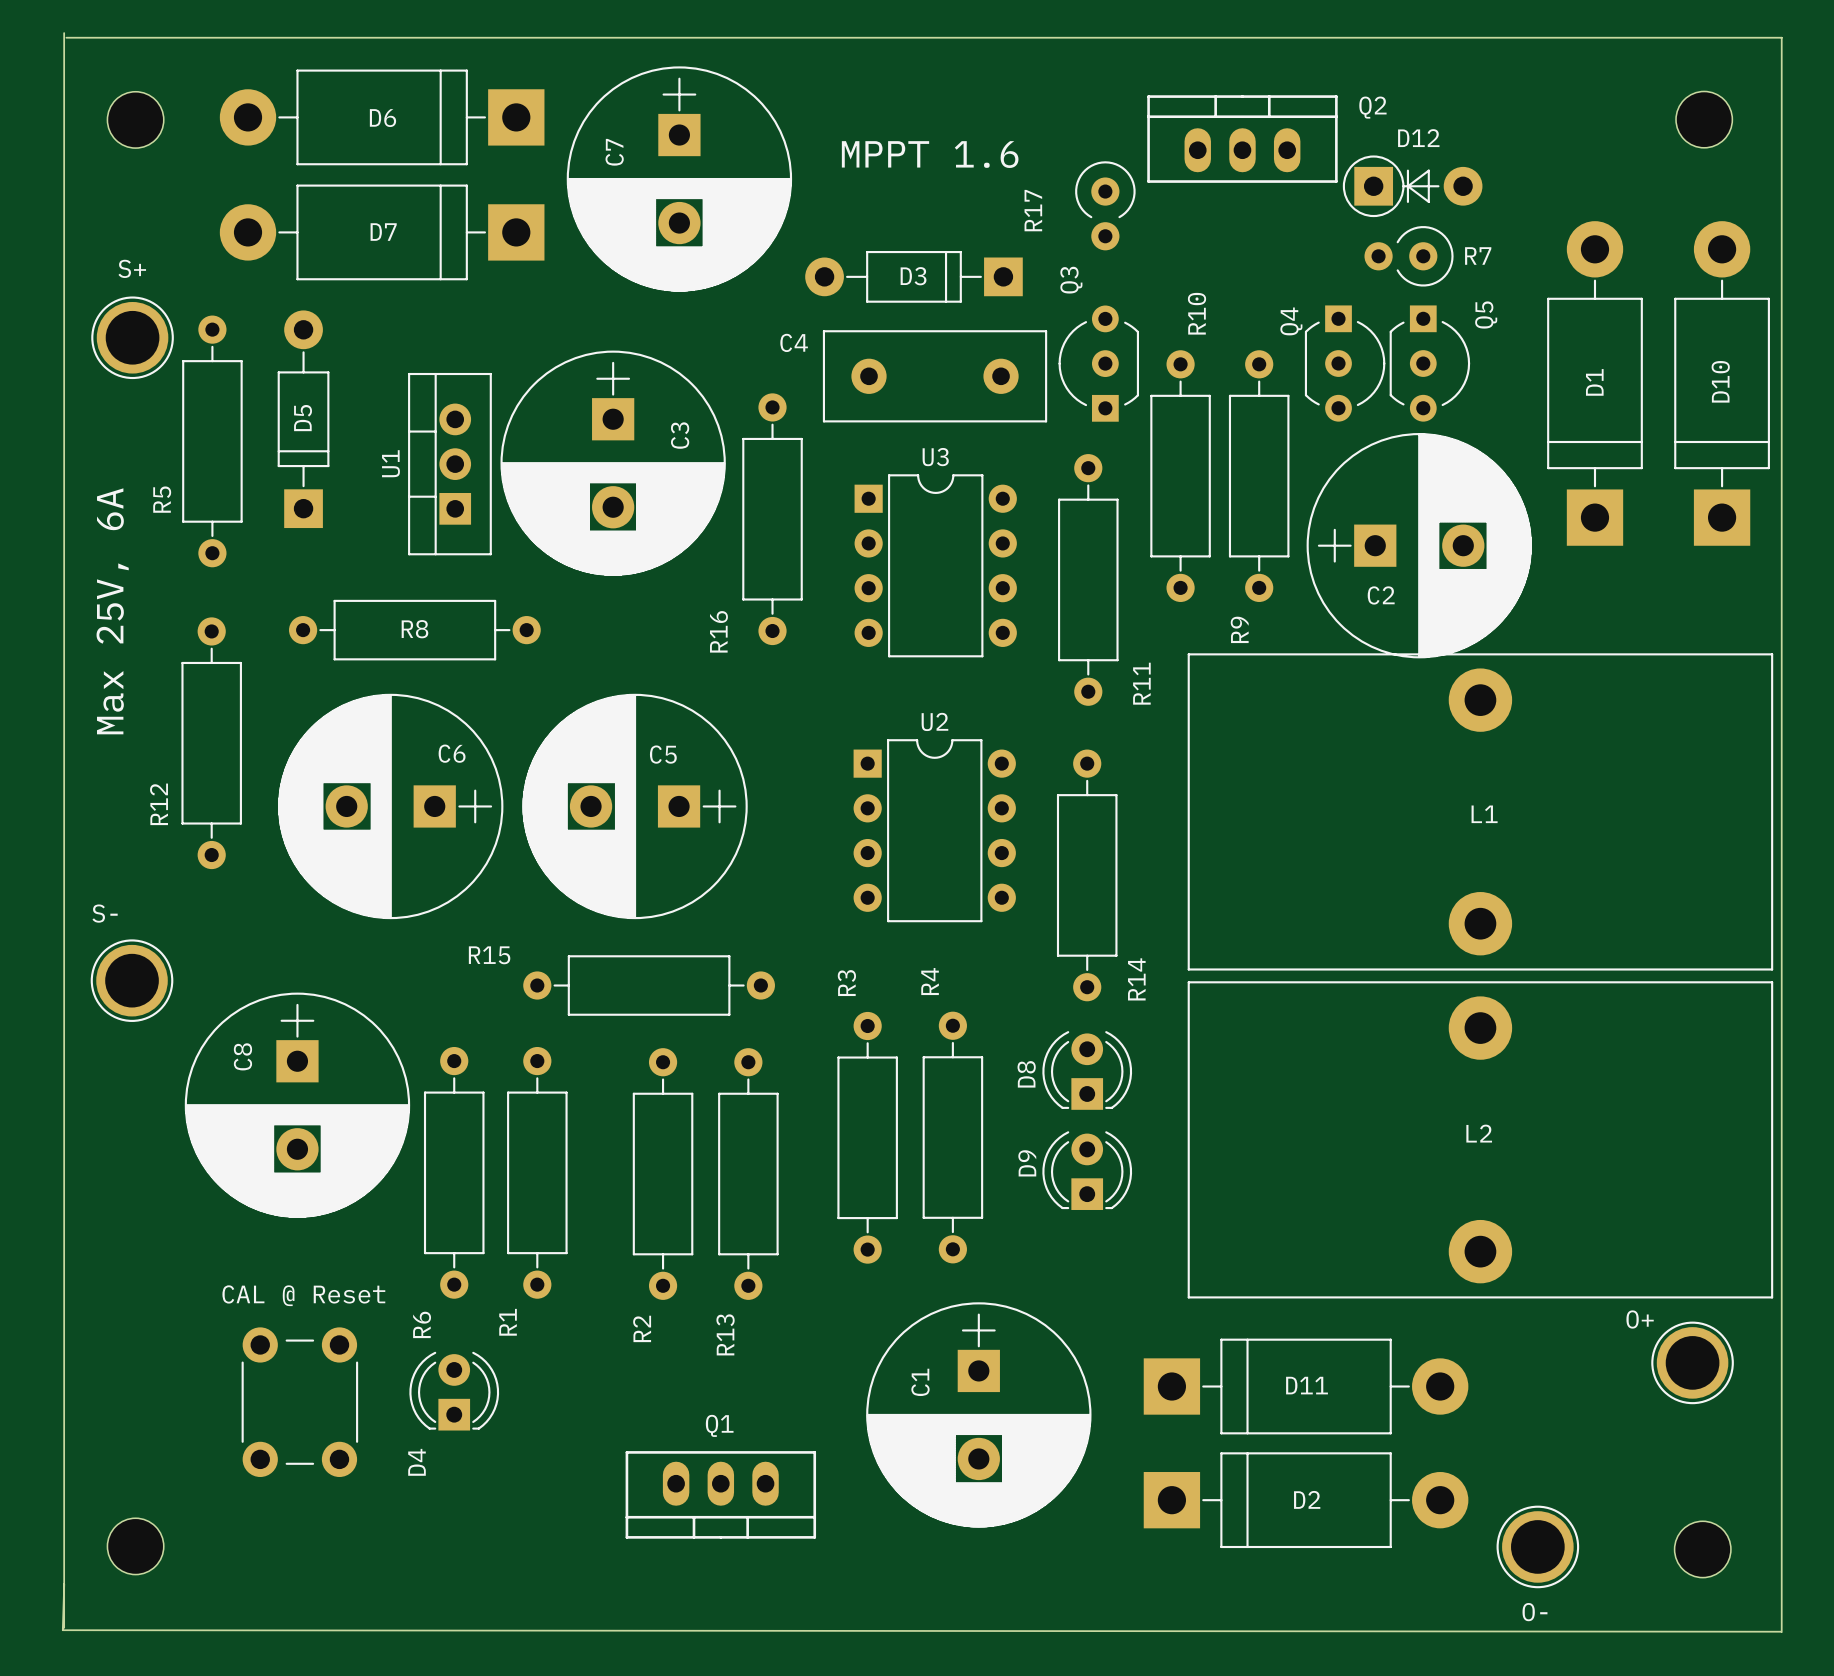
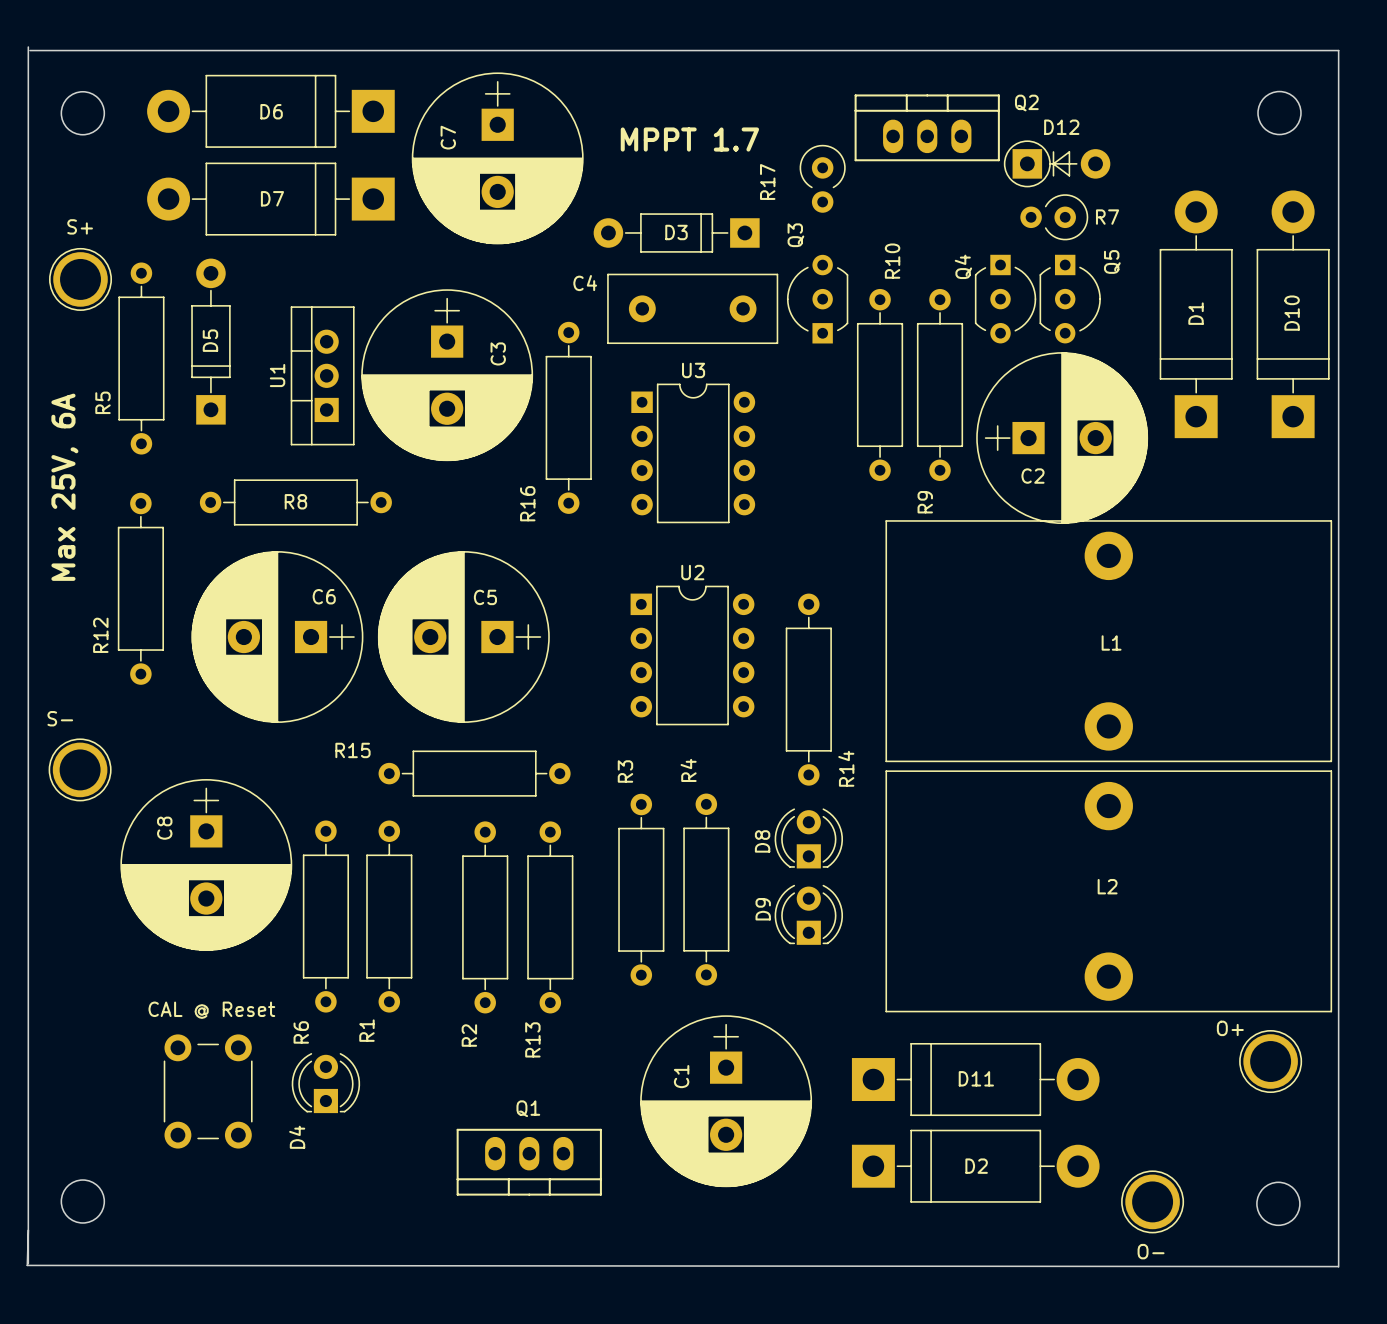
text: MPPT 1.6 (930, 154) -> MPPT 1.7 (689, 139)
R11: (1088, 579) -> none

